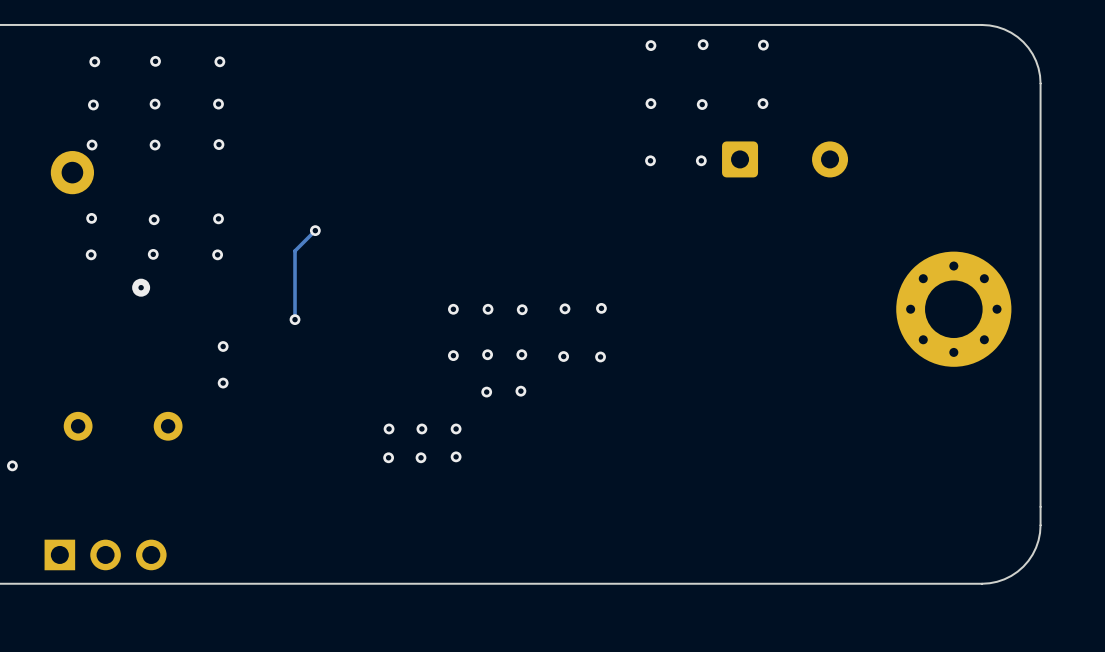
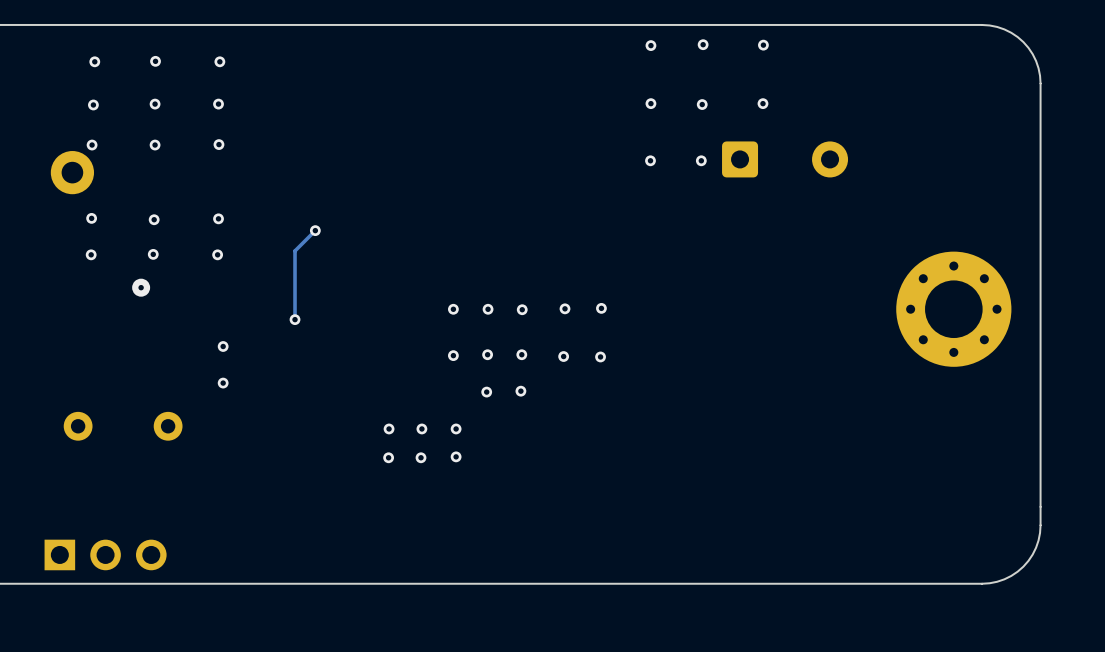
via: (12, 465) -> none

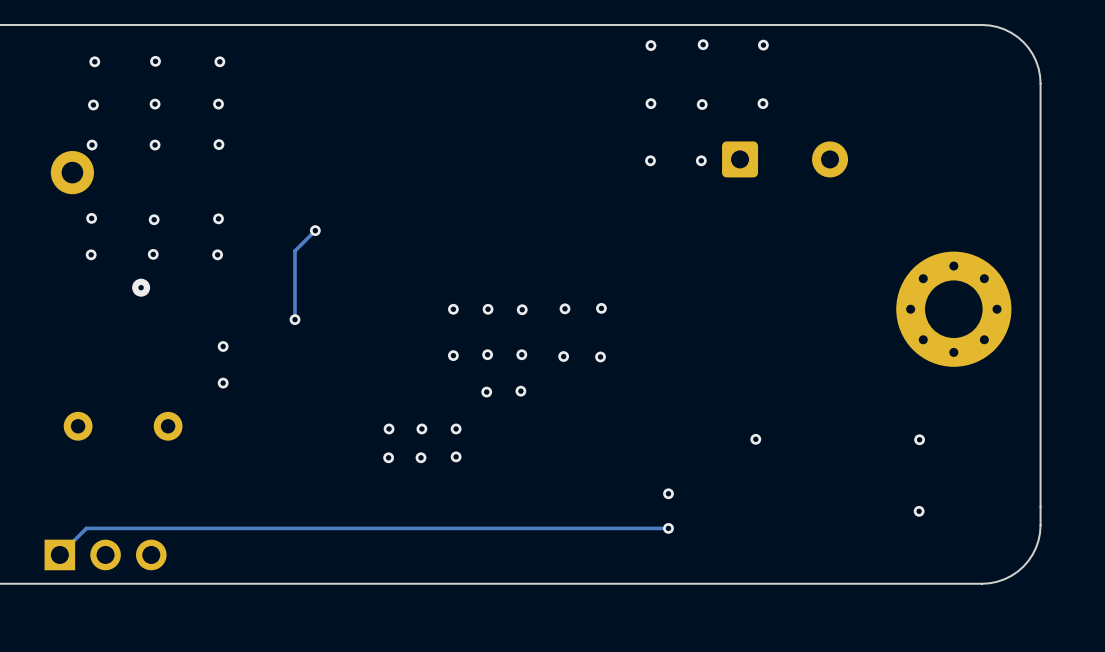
via: none -> (755, 439)
via: none -> (919, 439)
via: none -> (668, 493)
via: none -> (919, 511)
track: none -> (668, 528) (86, 528) (59, 554)
via: none -> (668, 528)

